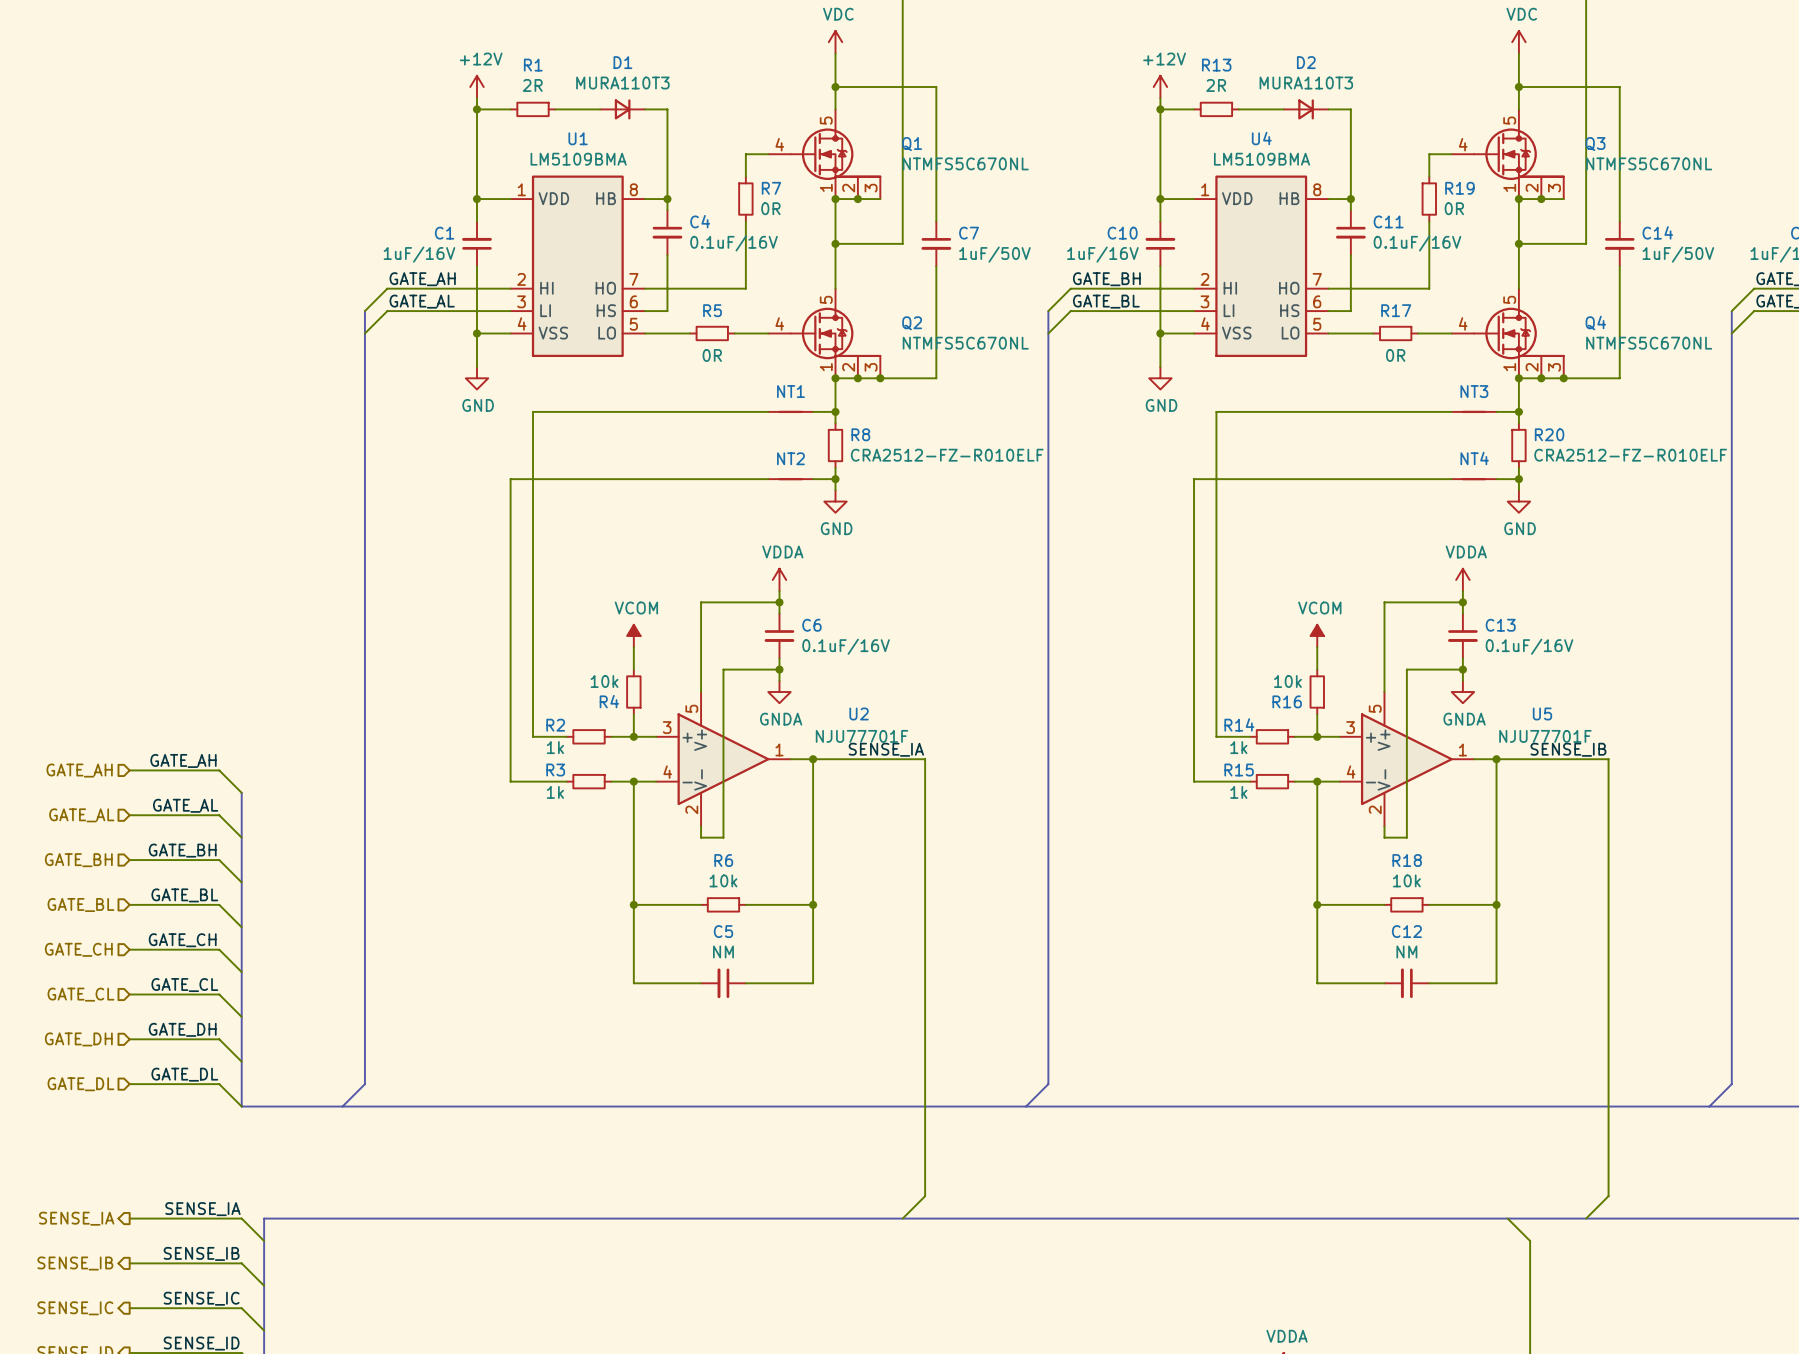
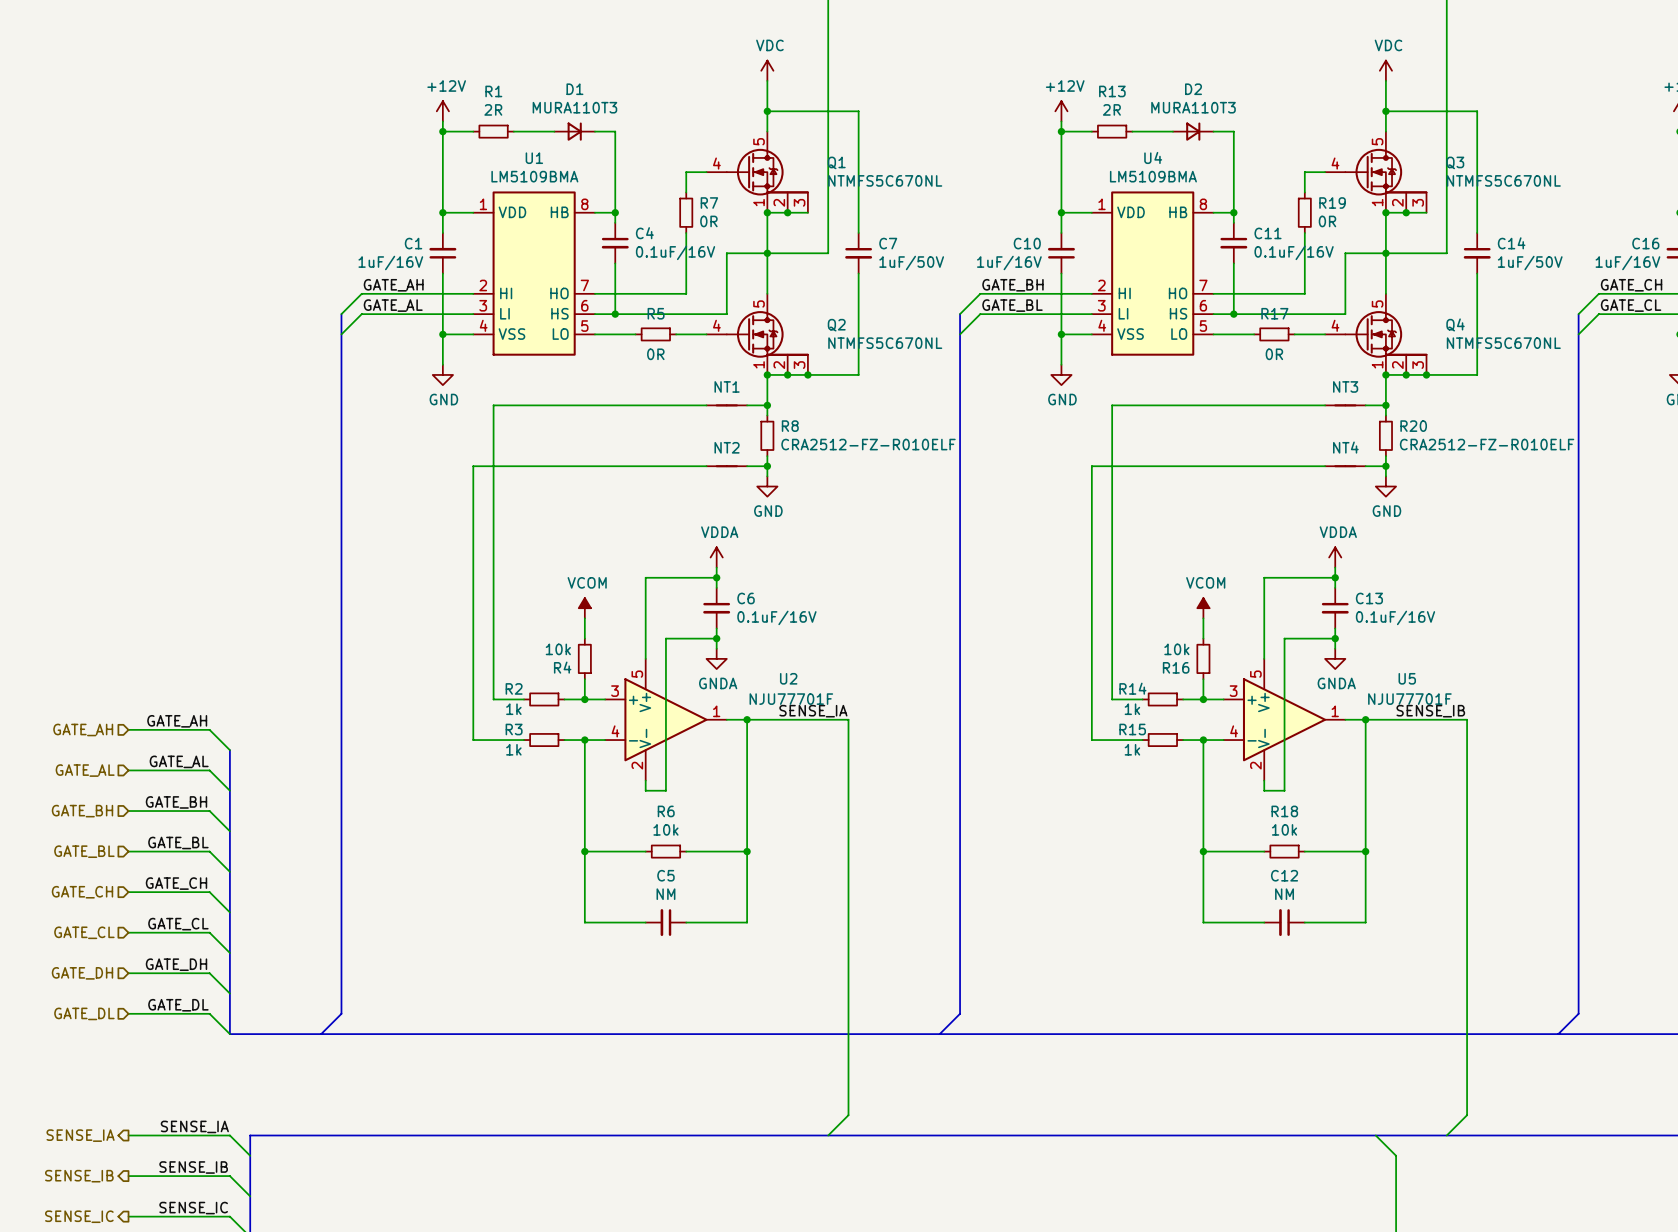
wire: none -> (767, 253) (726, 253) (726, 314) (615, 314)
wire: none -> (1385, 253) (1345, 253) (1345, 314) (1233, 314)
junction: none -> (615, 314)
junction: none -> (1233, 314)

